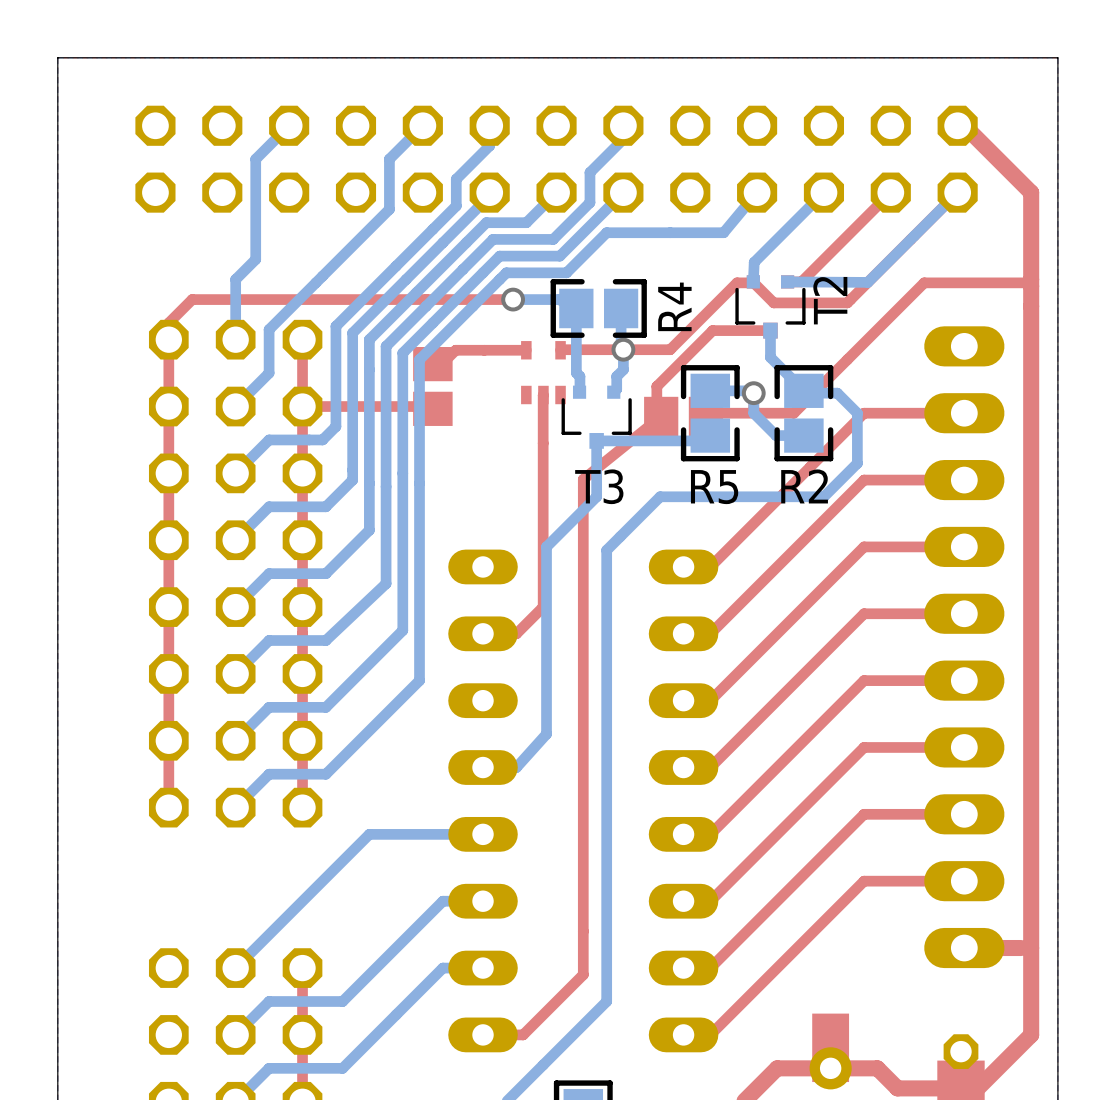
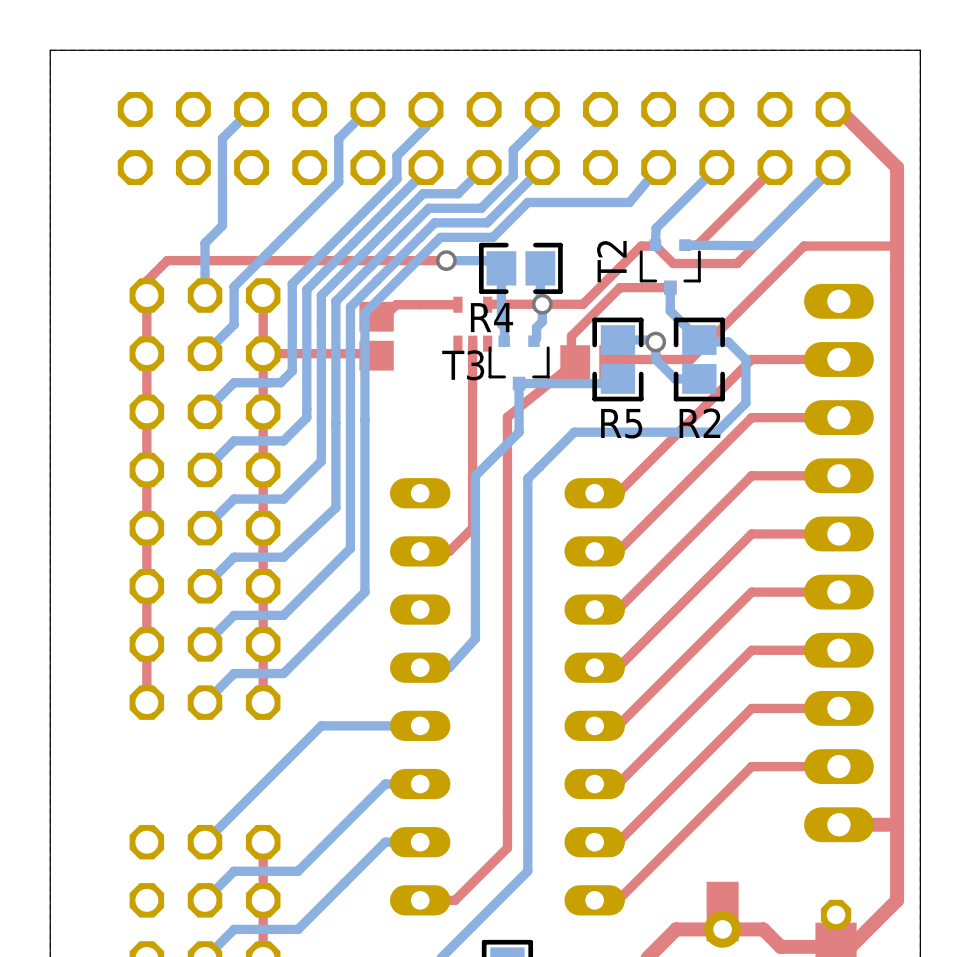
T2 name position: T2 (830, 300) -> T2 (611, 261)
R4 name rotation: 0° (674, 306) -> 90° clockwise (492, 317)
R4 name position: R4 (674, 306) -> R4 (492, 317)
T3 name position: T3 (599, 486) -> T3 (463, 365)

